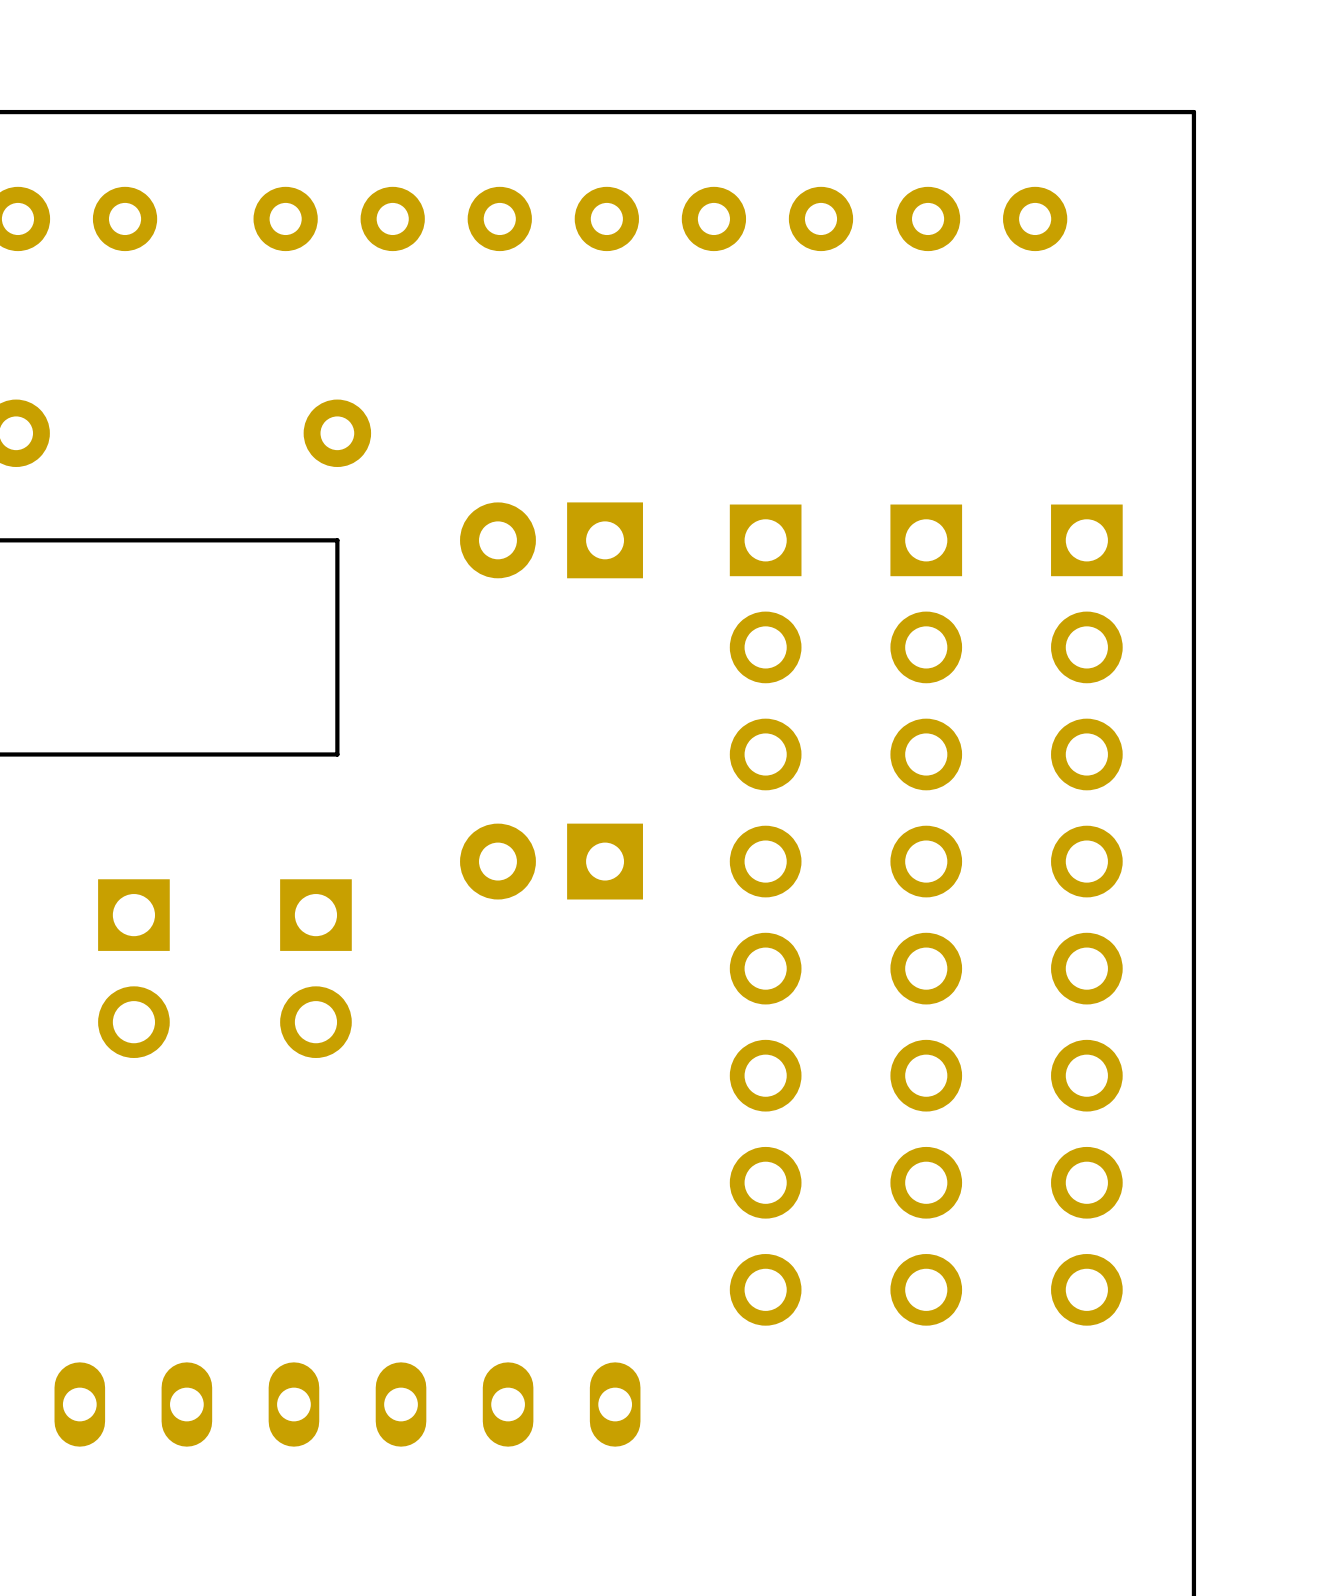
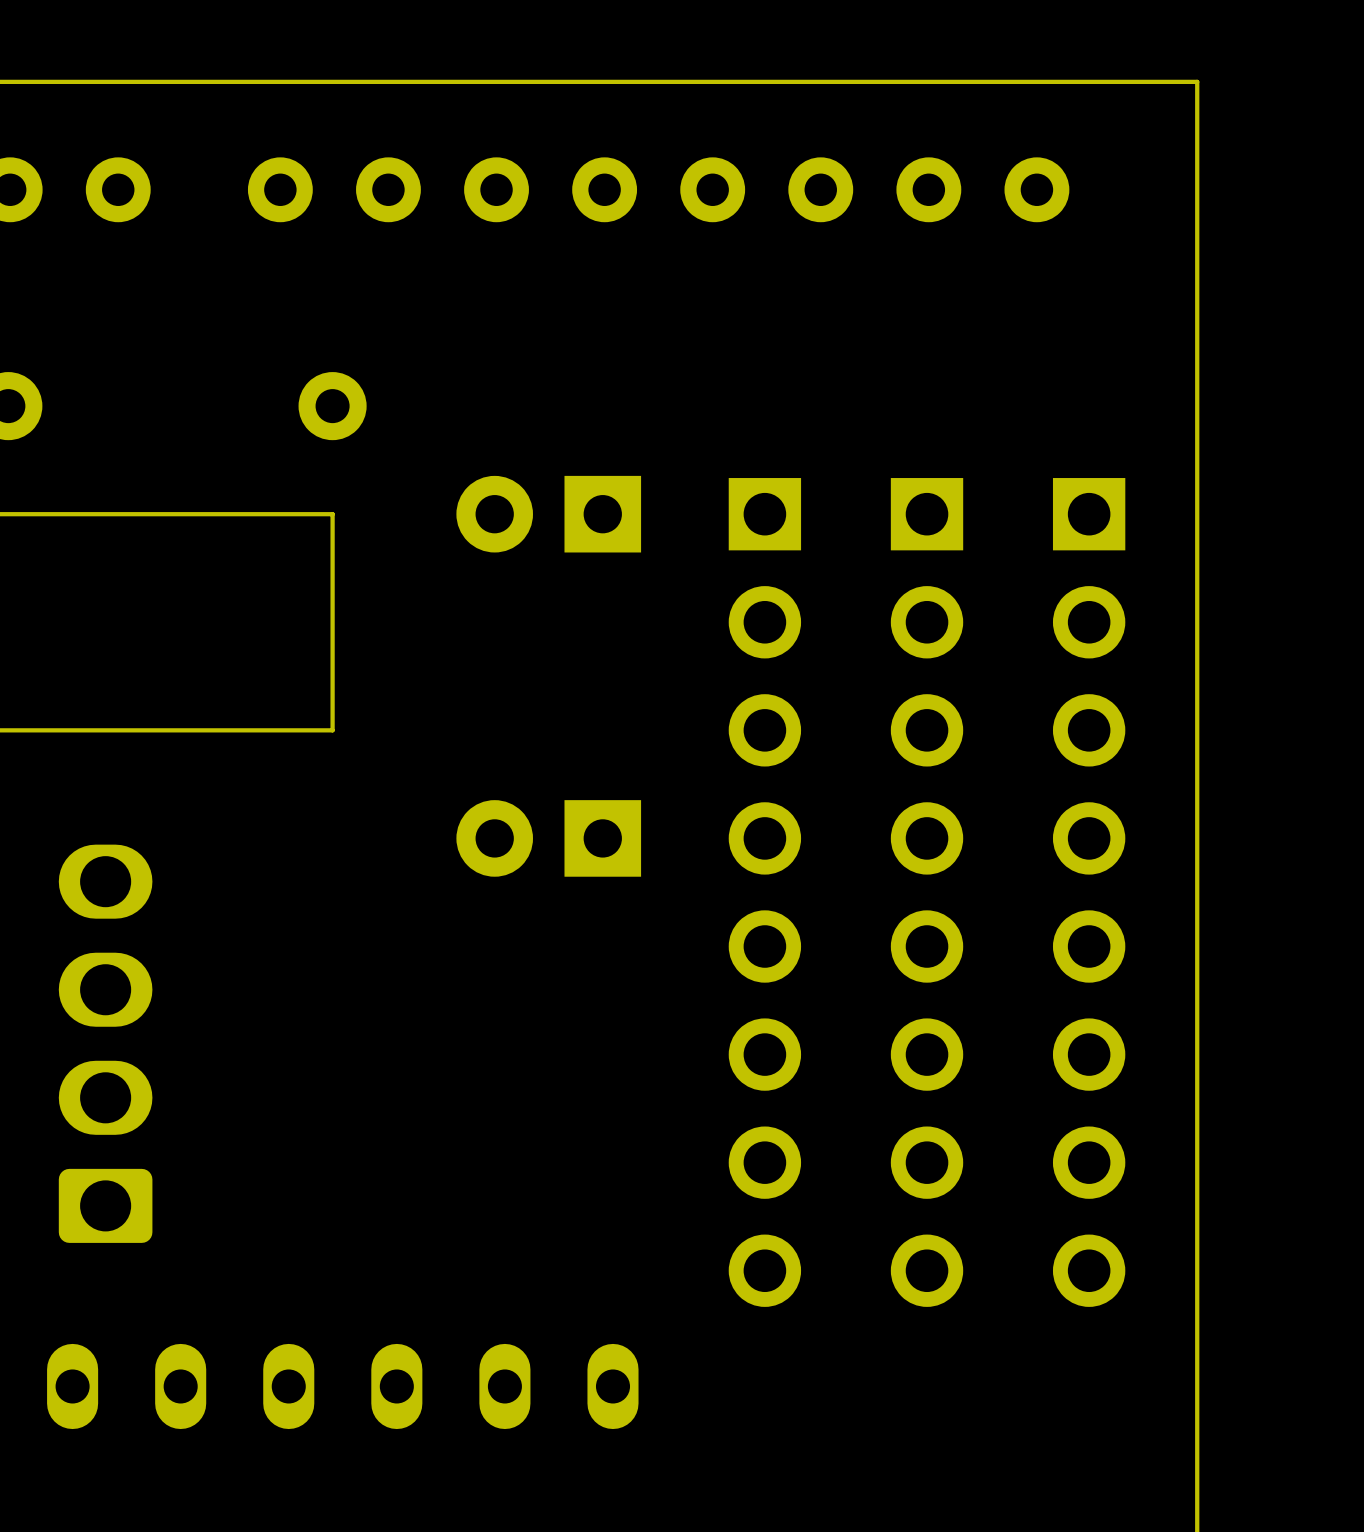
part: (133, 968) -> none
part: (315, 968) -> none
part: none -> (105, 1043)

